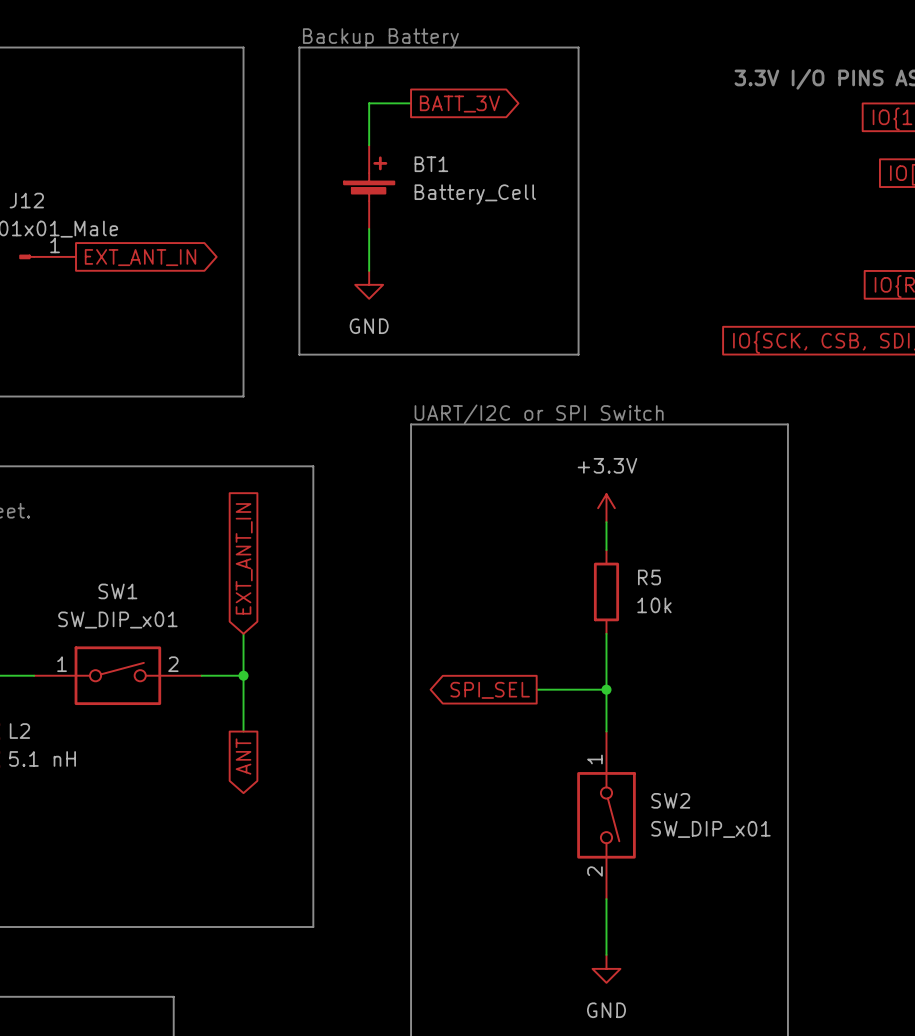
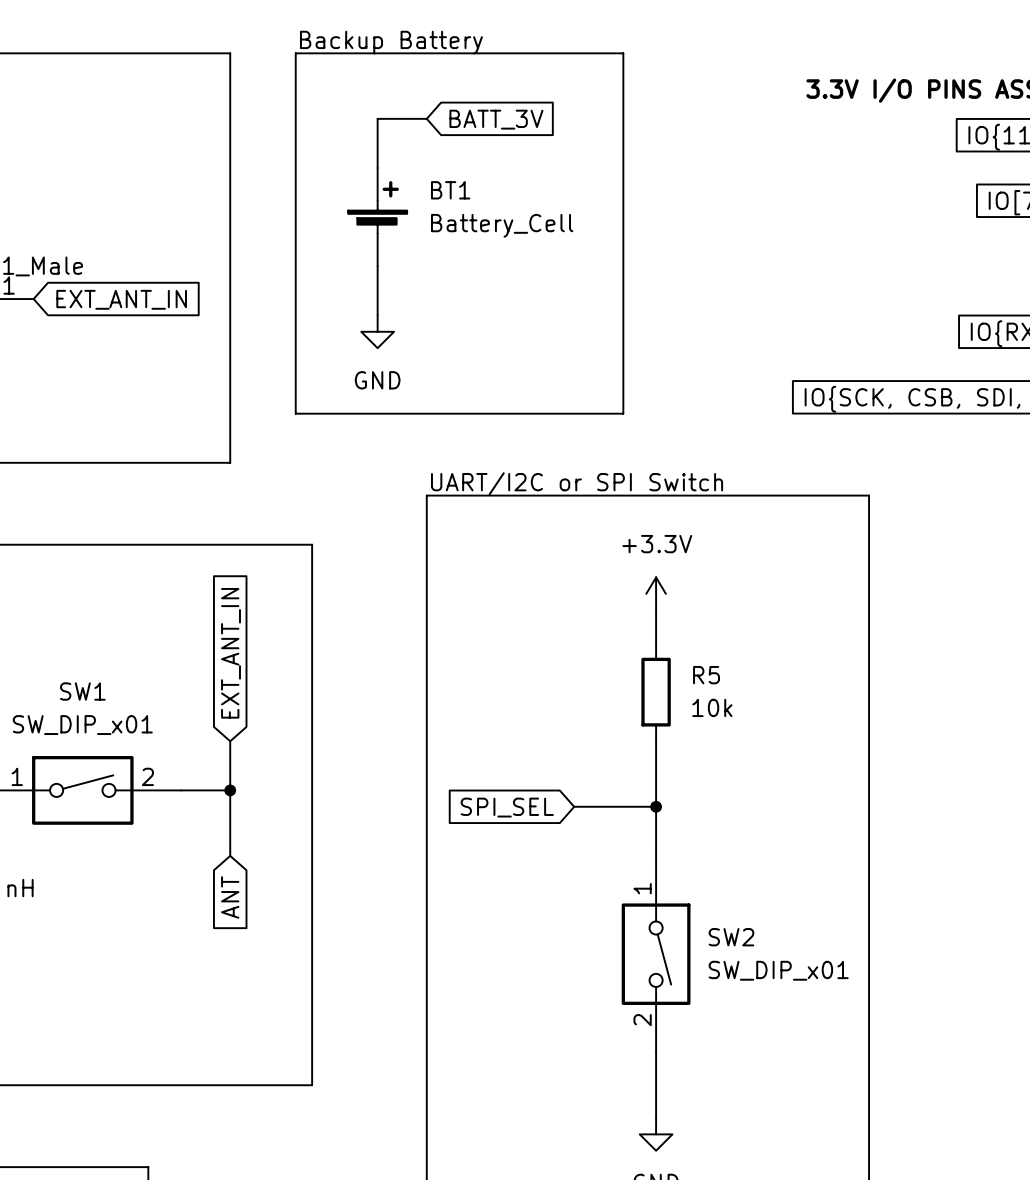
global label shape: output (459, 104) -> input (496, 119)
global label shape: output (140, 257) -> input (121, 299)
global label shape: output (490, 690) -> input (507, 807)
global label shape: output (243, 756) -> input (230, 897)

